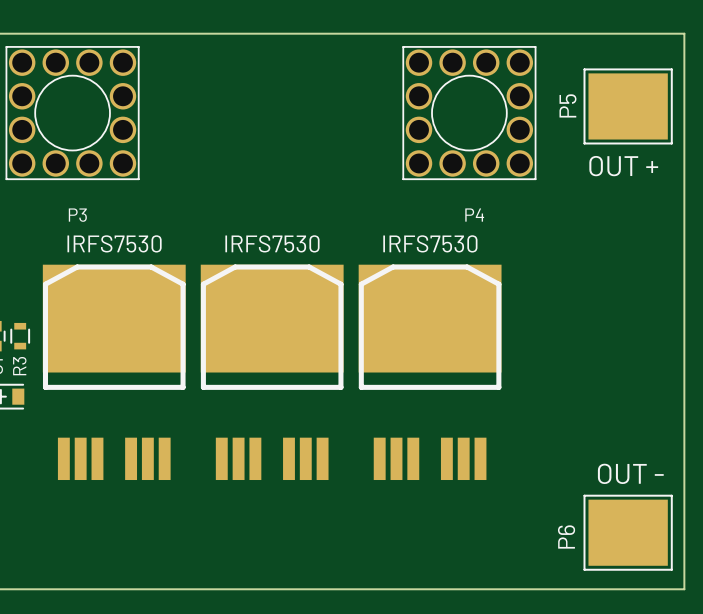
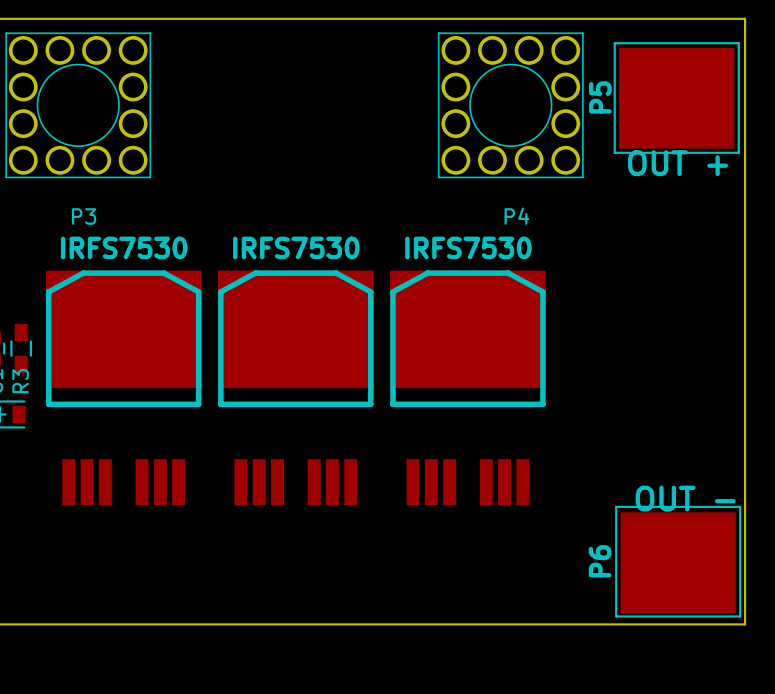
P5 footprint: [583, 68, 673, 145] -> [613, 42, 740, 154]
R3 footprint: [10, 322, 31, 350] -> [10, 324, 32, 374]
P6 footprint: [583, 494, 673, 571] -> [615, 505, 742, 618]

